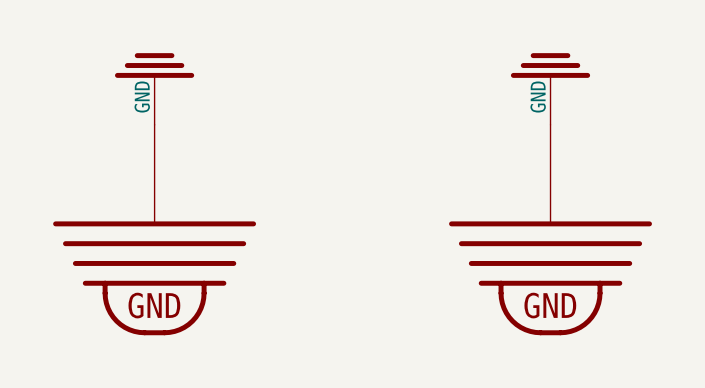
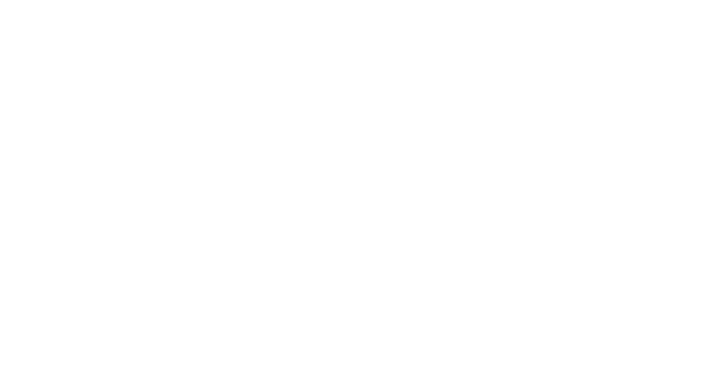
power symbol: GND (154, 89) -> none
power symbol: GND (550, 89) -> none
part: (154, 230) -> none
part: (550, 230) -> none

